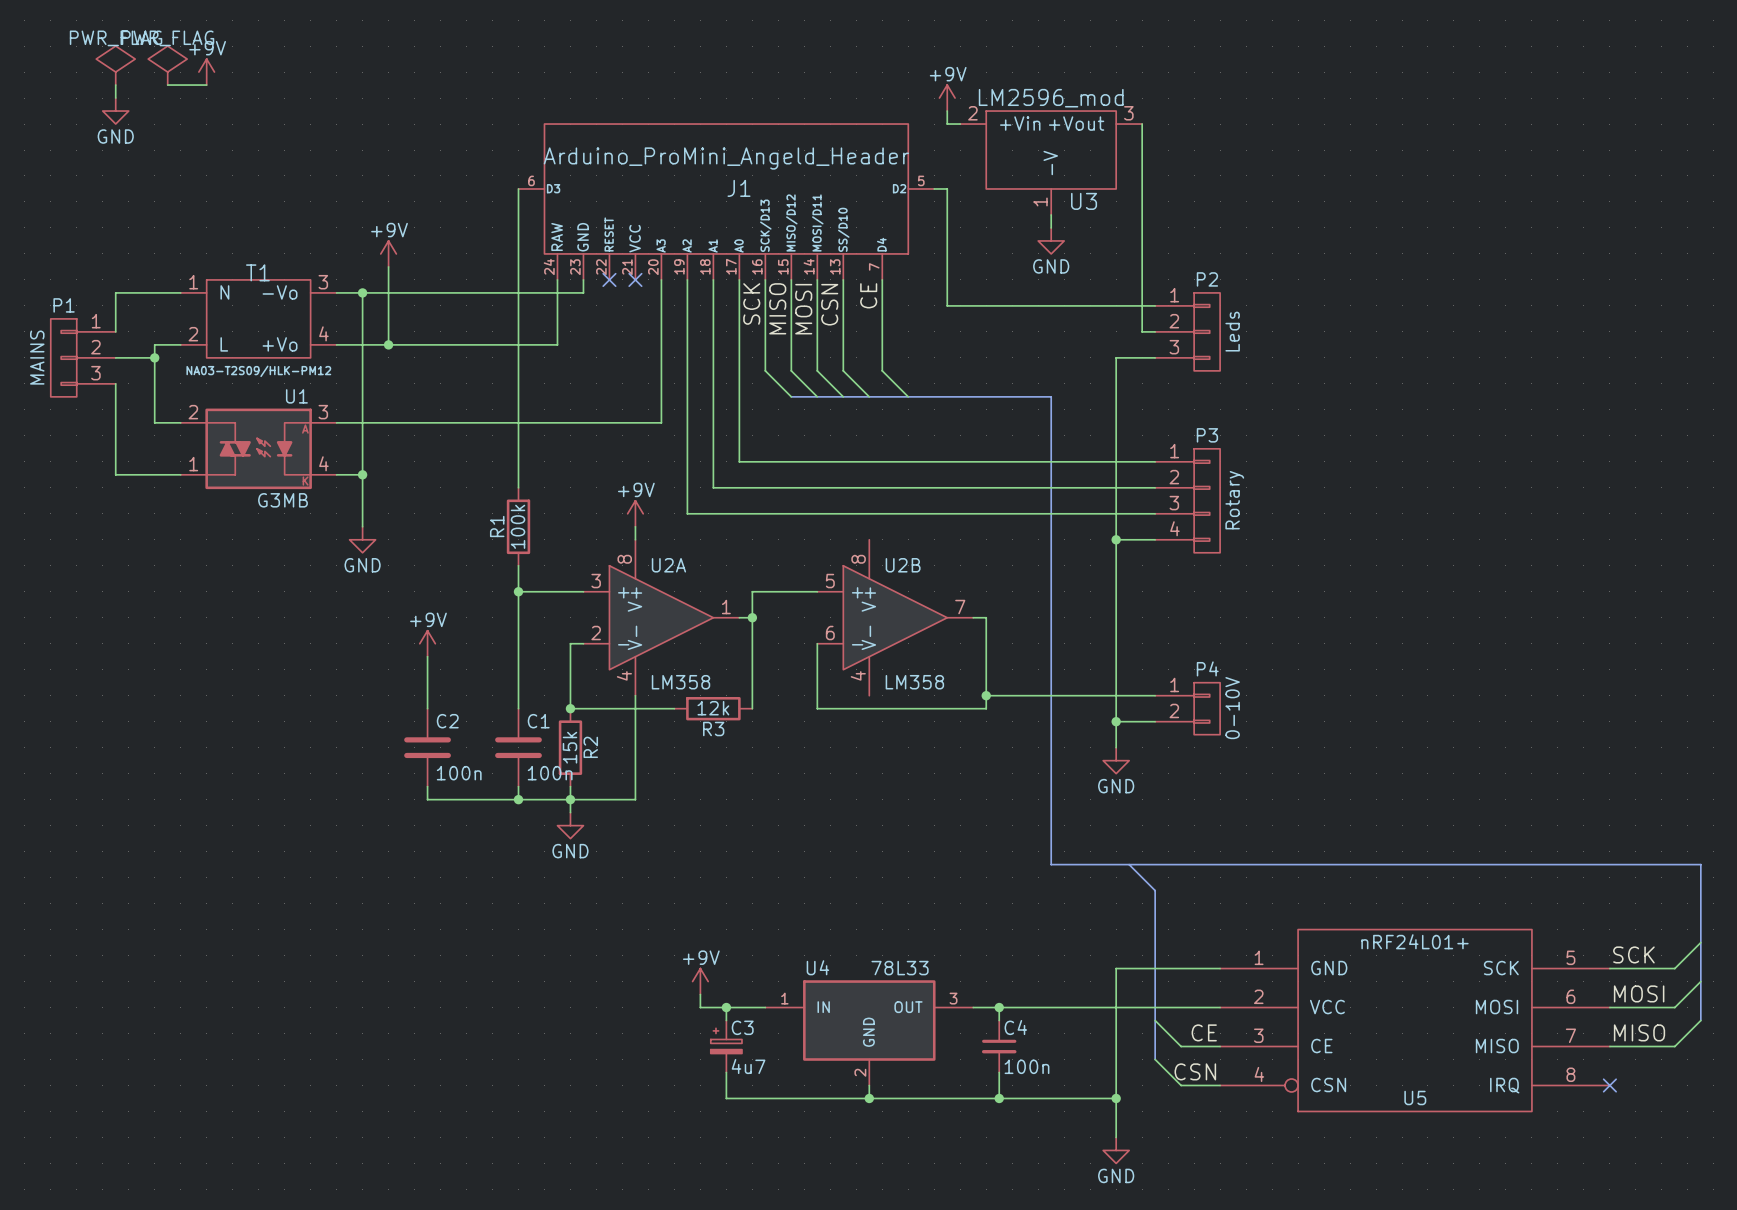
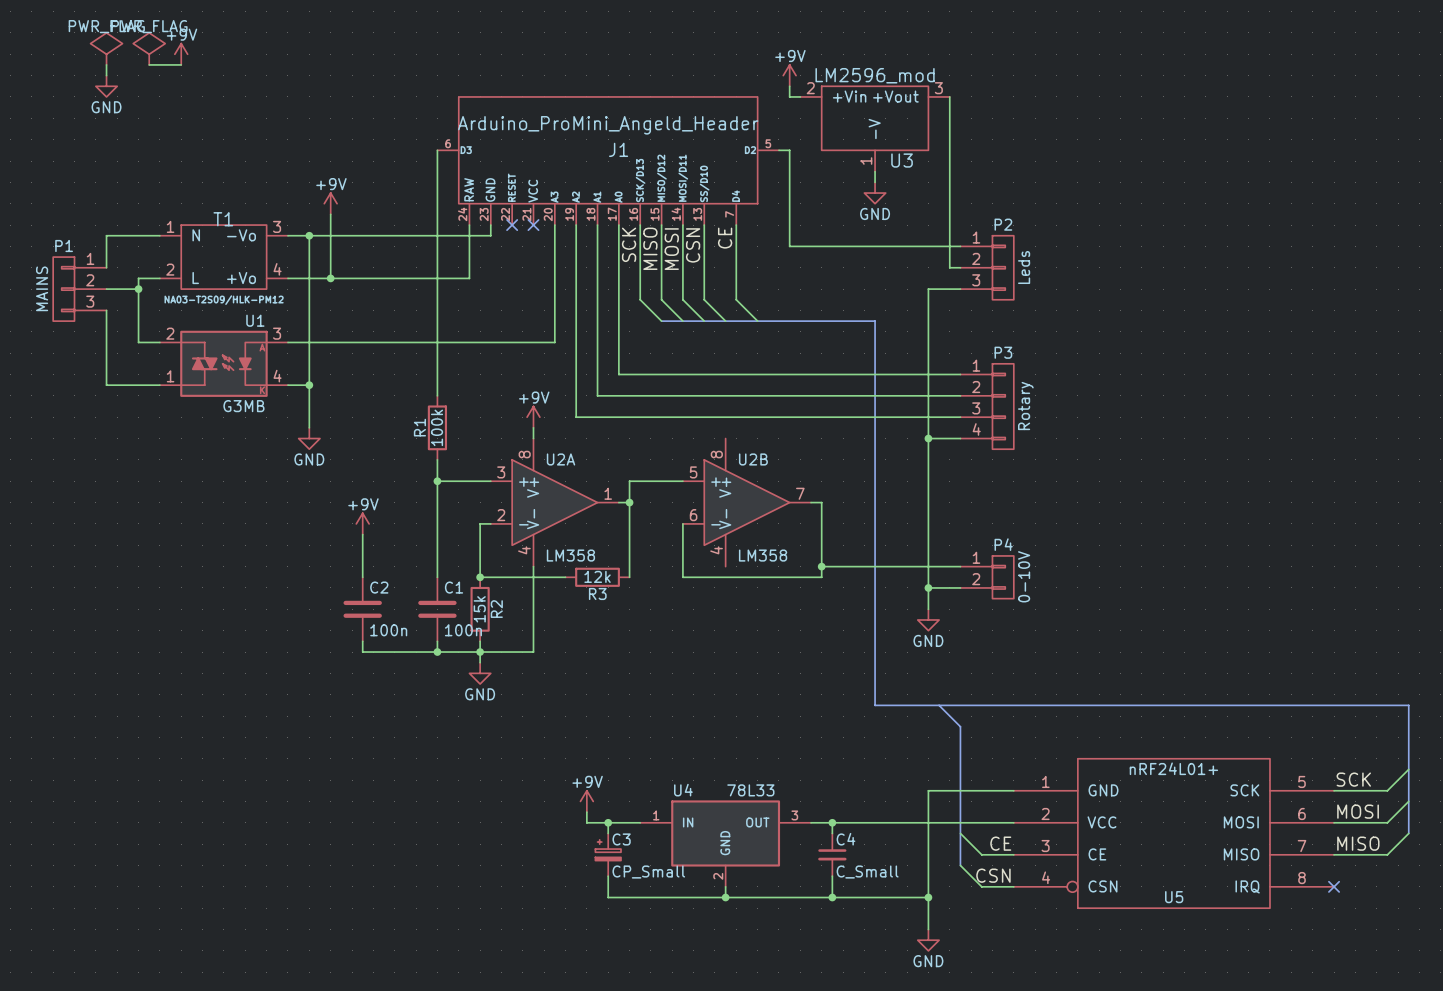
C3 value: 4u7 (748, 1066) -> CP_Small (648, 872)
C4 value: 100n (1026, 1066) -> C_Small (867, 872)

